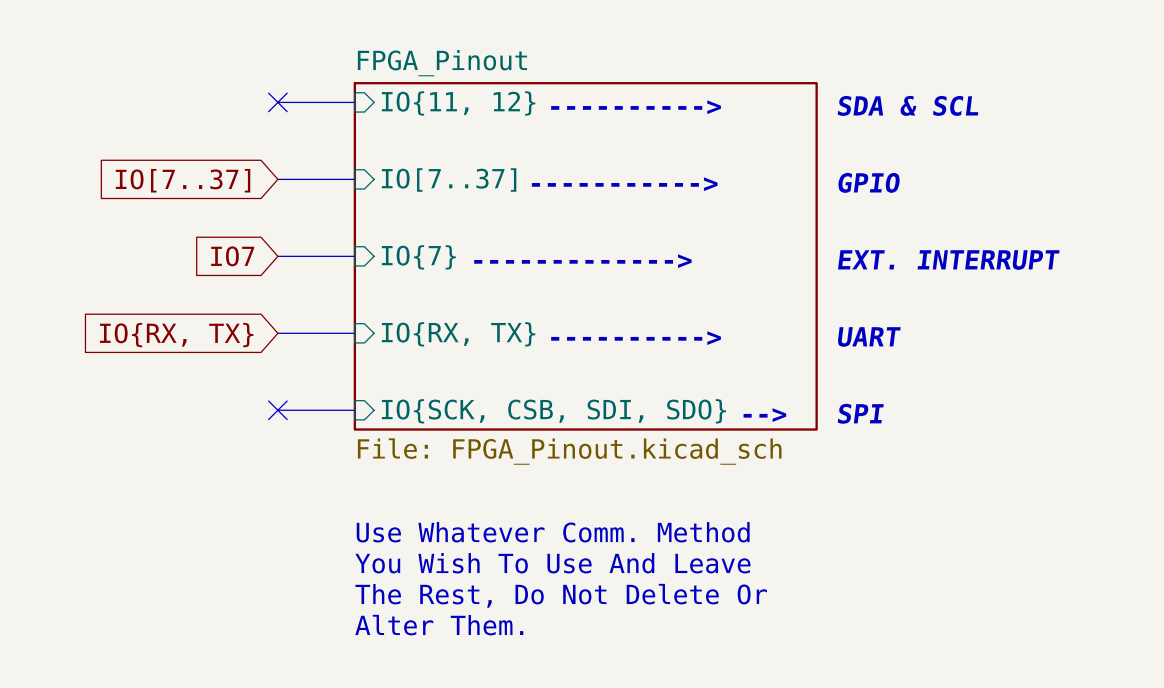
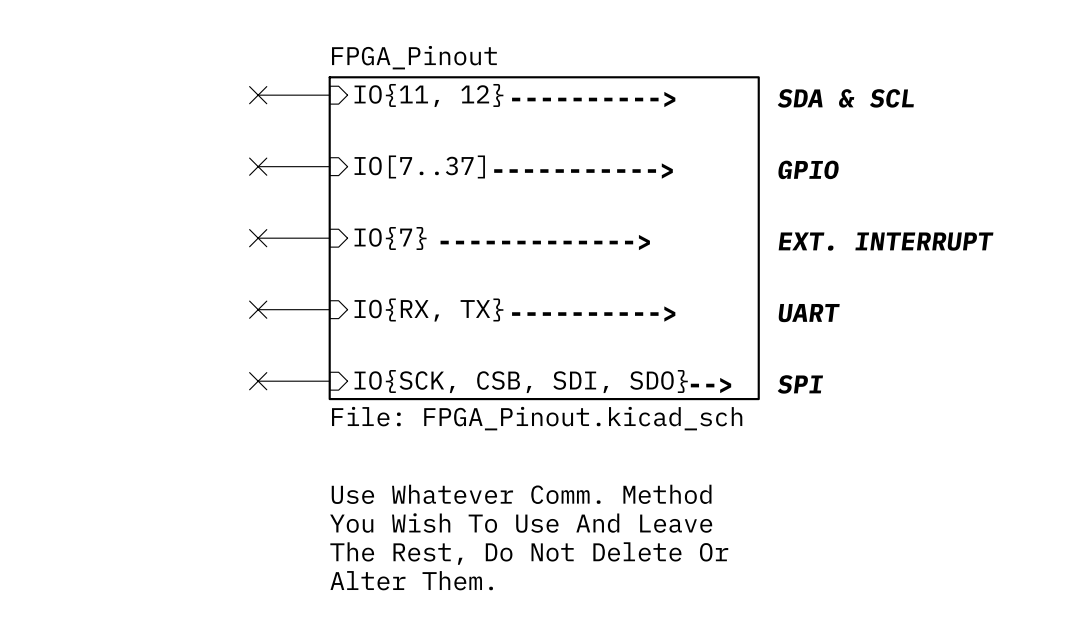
no-connect mark: none -> (258, 166)
global label: IO[7..37] (183, 180) -> none
global label: IO7 (232, 256) -> none
no-connect mark: none -> (258, 238)
no-connect mark: none -> (258, 309)
global label: IO{RX, TX} (176, 335) -> none

